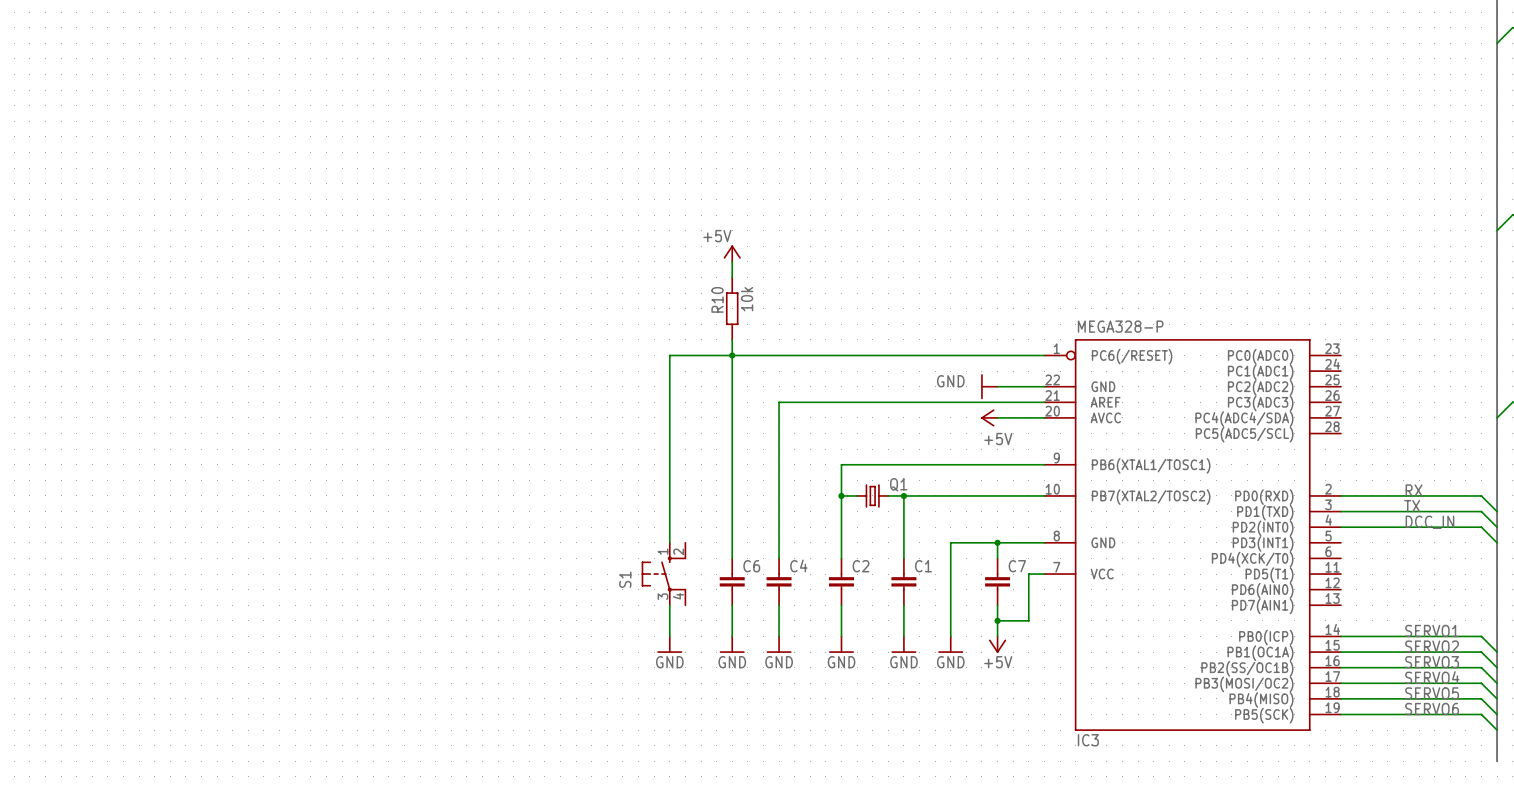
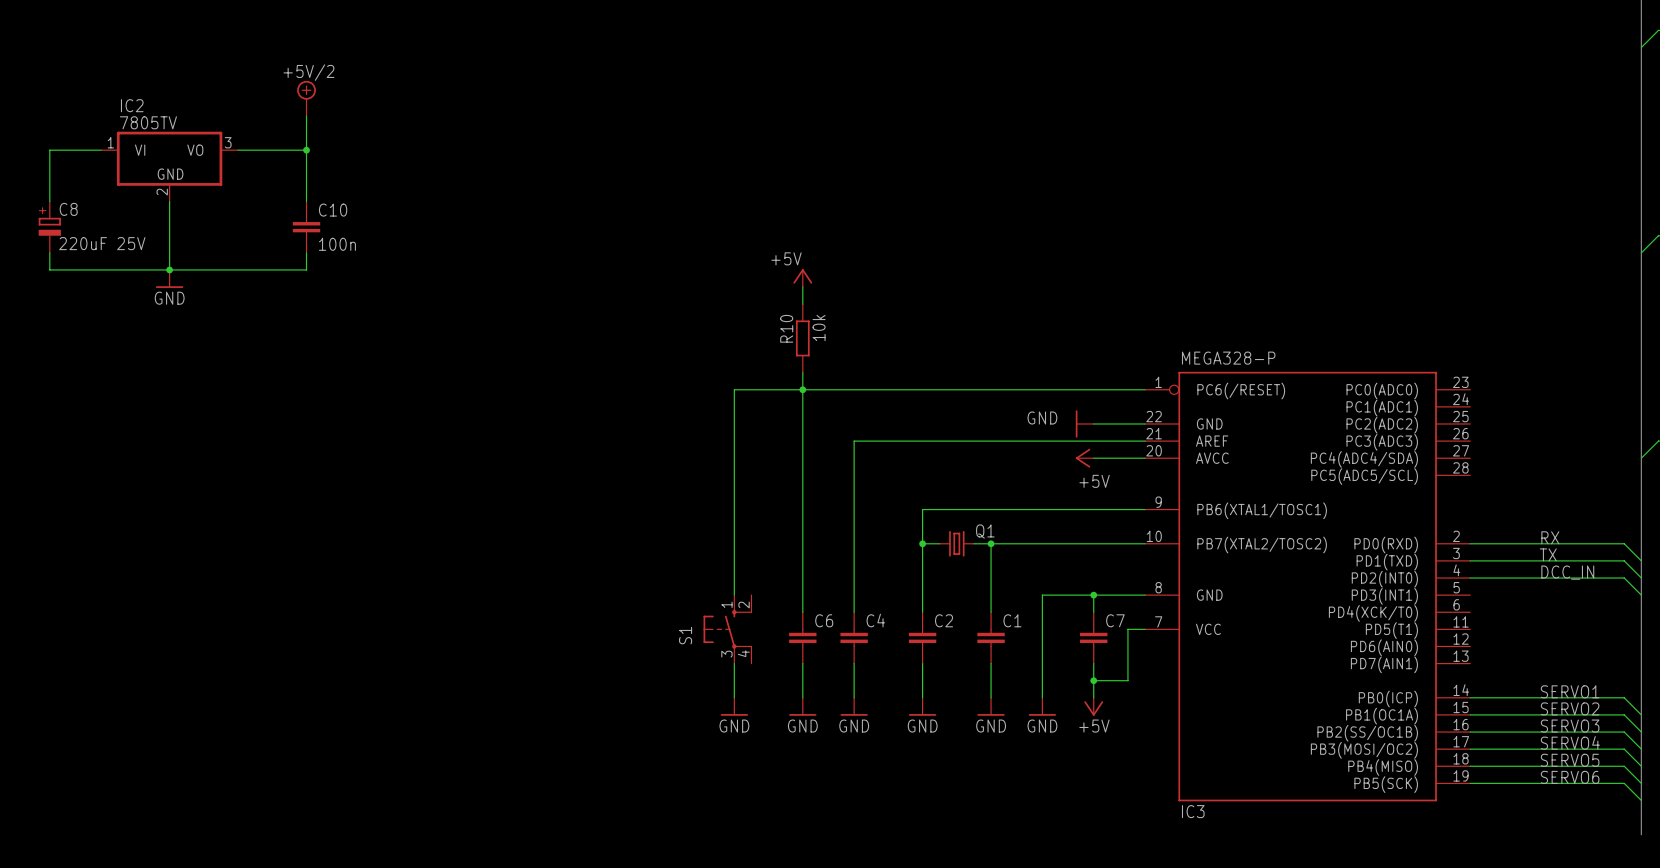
power symbol: none -> +5V/2 (306, 98)
wire: none -> (306, 115) (306, 201)
wire: none -> (101, 150) (49, 150) (49, 201)
wire: none -> (238, 150) (306, 150)
junction: none -> (306, 150)
IC2: none -> 7805TV (169, 166)
wire: none -> (169, 201) (169, 269)
C8: none -> 220uF 25V (49, 227)
C10: none -> 100n (306, 227)
wire: none -> (49, 252) (49, 269) (306, 269) (306, 252)
junction: none -> (169, 269)
power symbol: none -> GND (169, 278)

